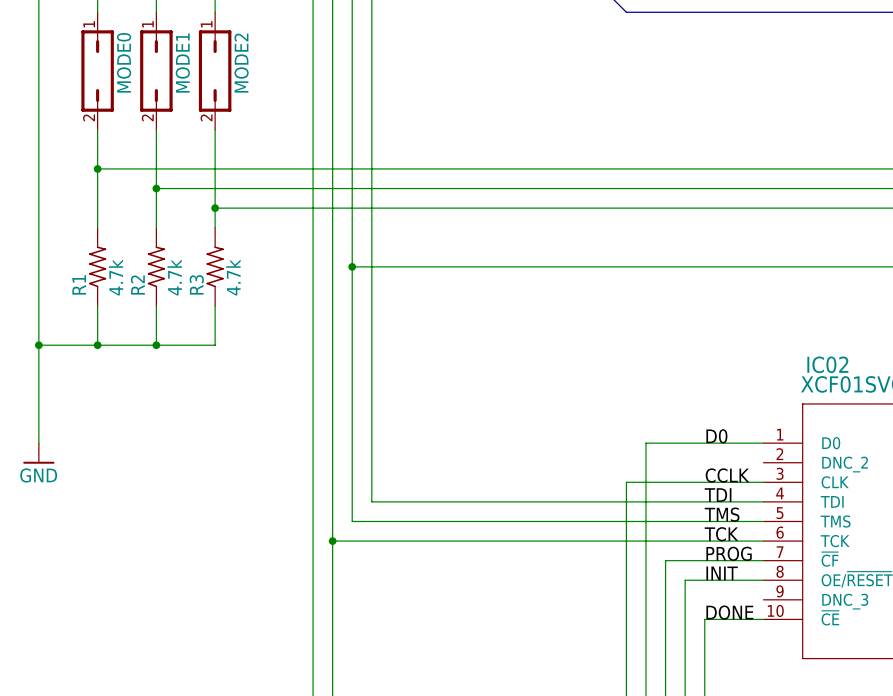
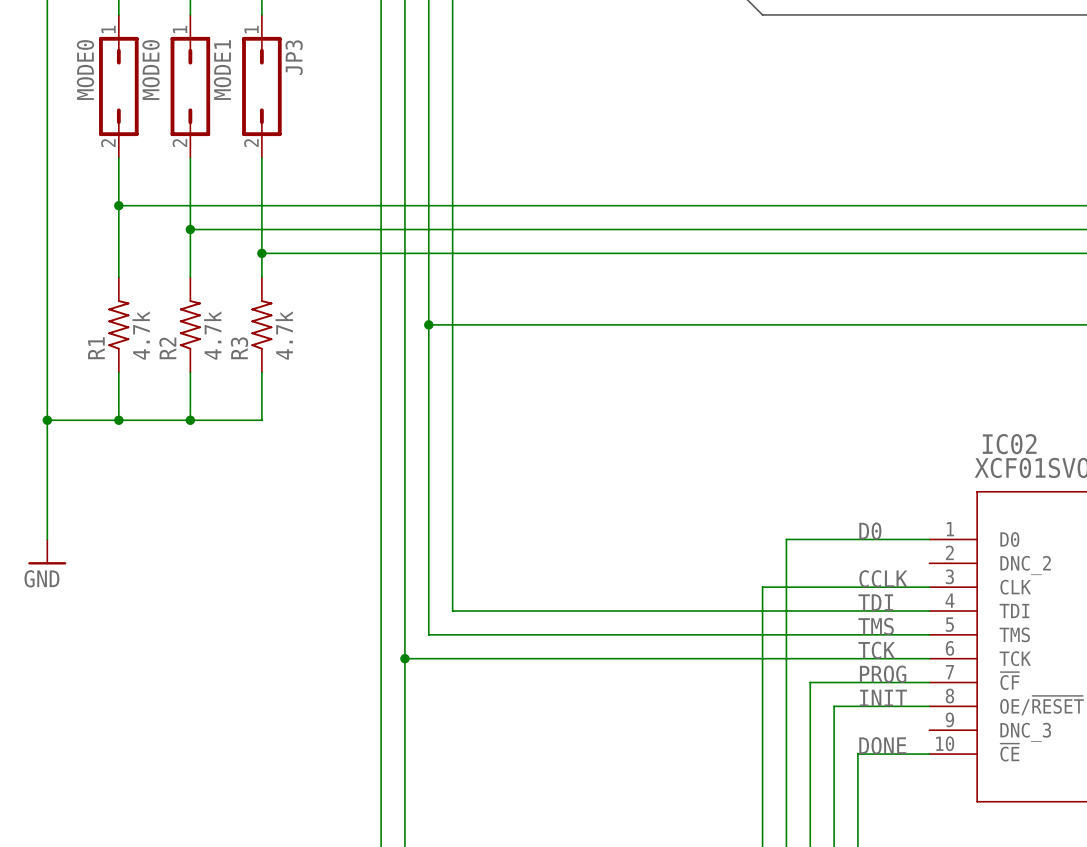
MODE0 value: none -> MODE0 (85, 70)
MODE2 name: MODE2 (241, 63) -> JP3 (294, 57)

